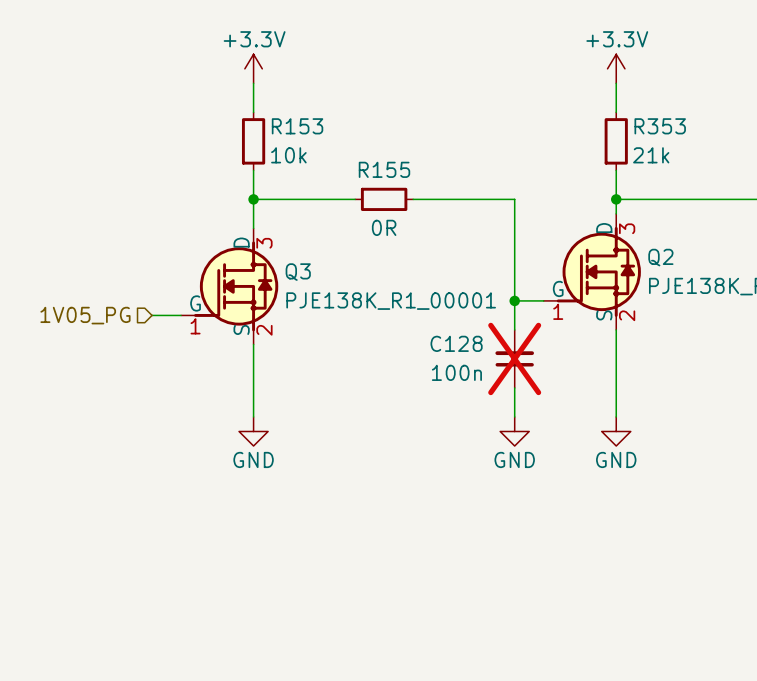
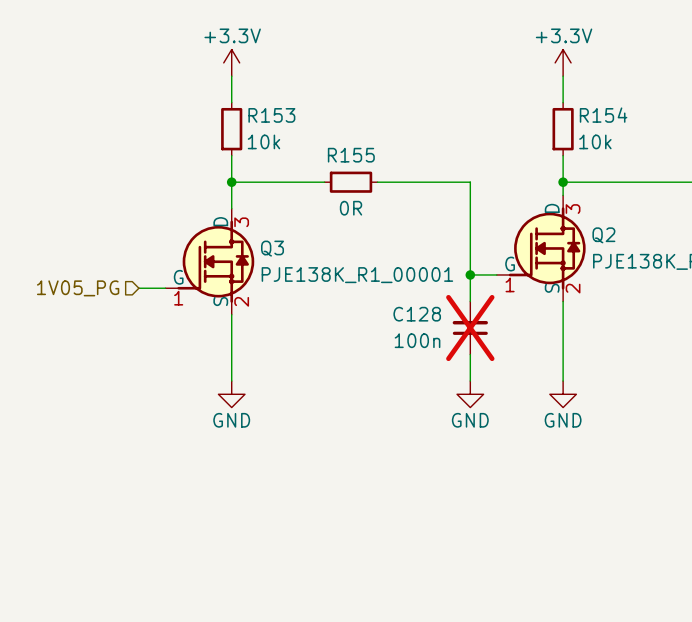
R353 name: R353 (660, 126) -> R154 (603, 115)
R353 text: 21k (651, 155) -> 10k (595, 141)

